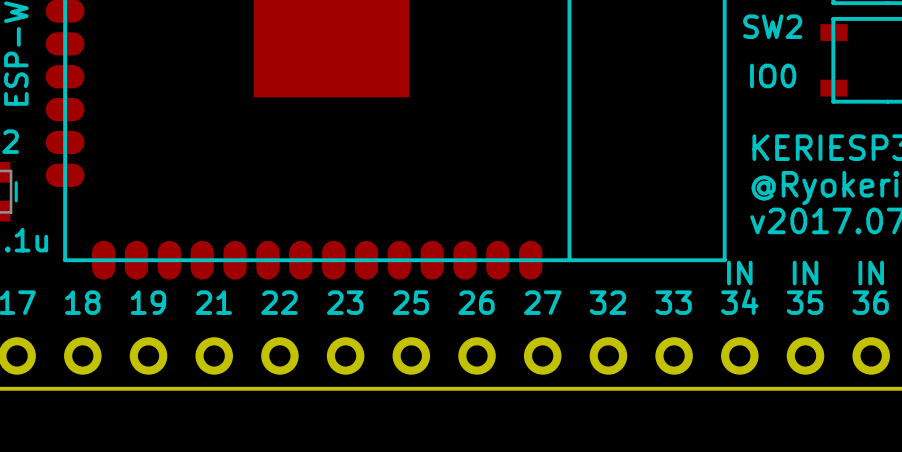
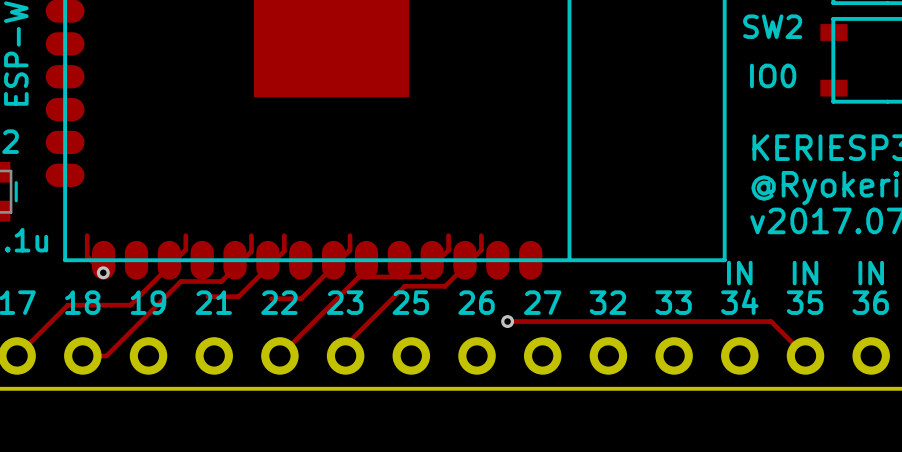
track: none -> (87, 235) (87, 256) (103, 272)
track: none -> (185, 235) (185, 249) (130, 305) (67, 305) (17, 355)
track: none -> (251, 235) (251, 251) (221, 281) (180, 281) (106, 355) (82, 355)
track: none -> (284, 235) (284, 251) (238, 296) (207, 296)
track: none -> (350, 235) (350, 249) (301, 298) (271, 298)
track: none -> (448, 235) (448, 250) (421, 276) (358, 276) (279, 355)
track: none -> (481, 235) (481, 250) (445, 286) (404, 286) (345, 345) (345, 355)
via: none -> (103, 272)
track: none -> (507, 321) (771, 321) (805, 355)
via: none -> (507, 321)

